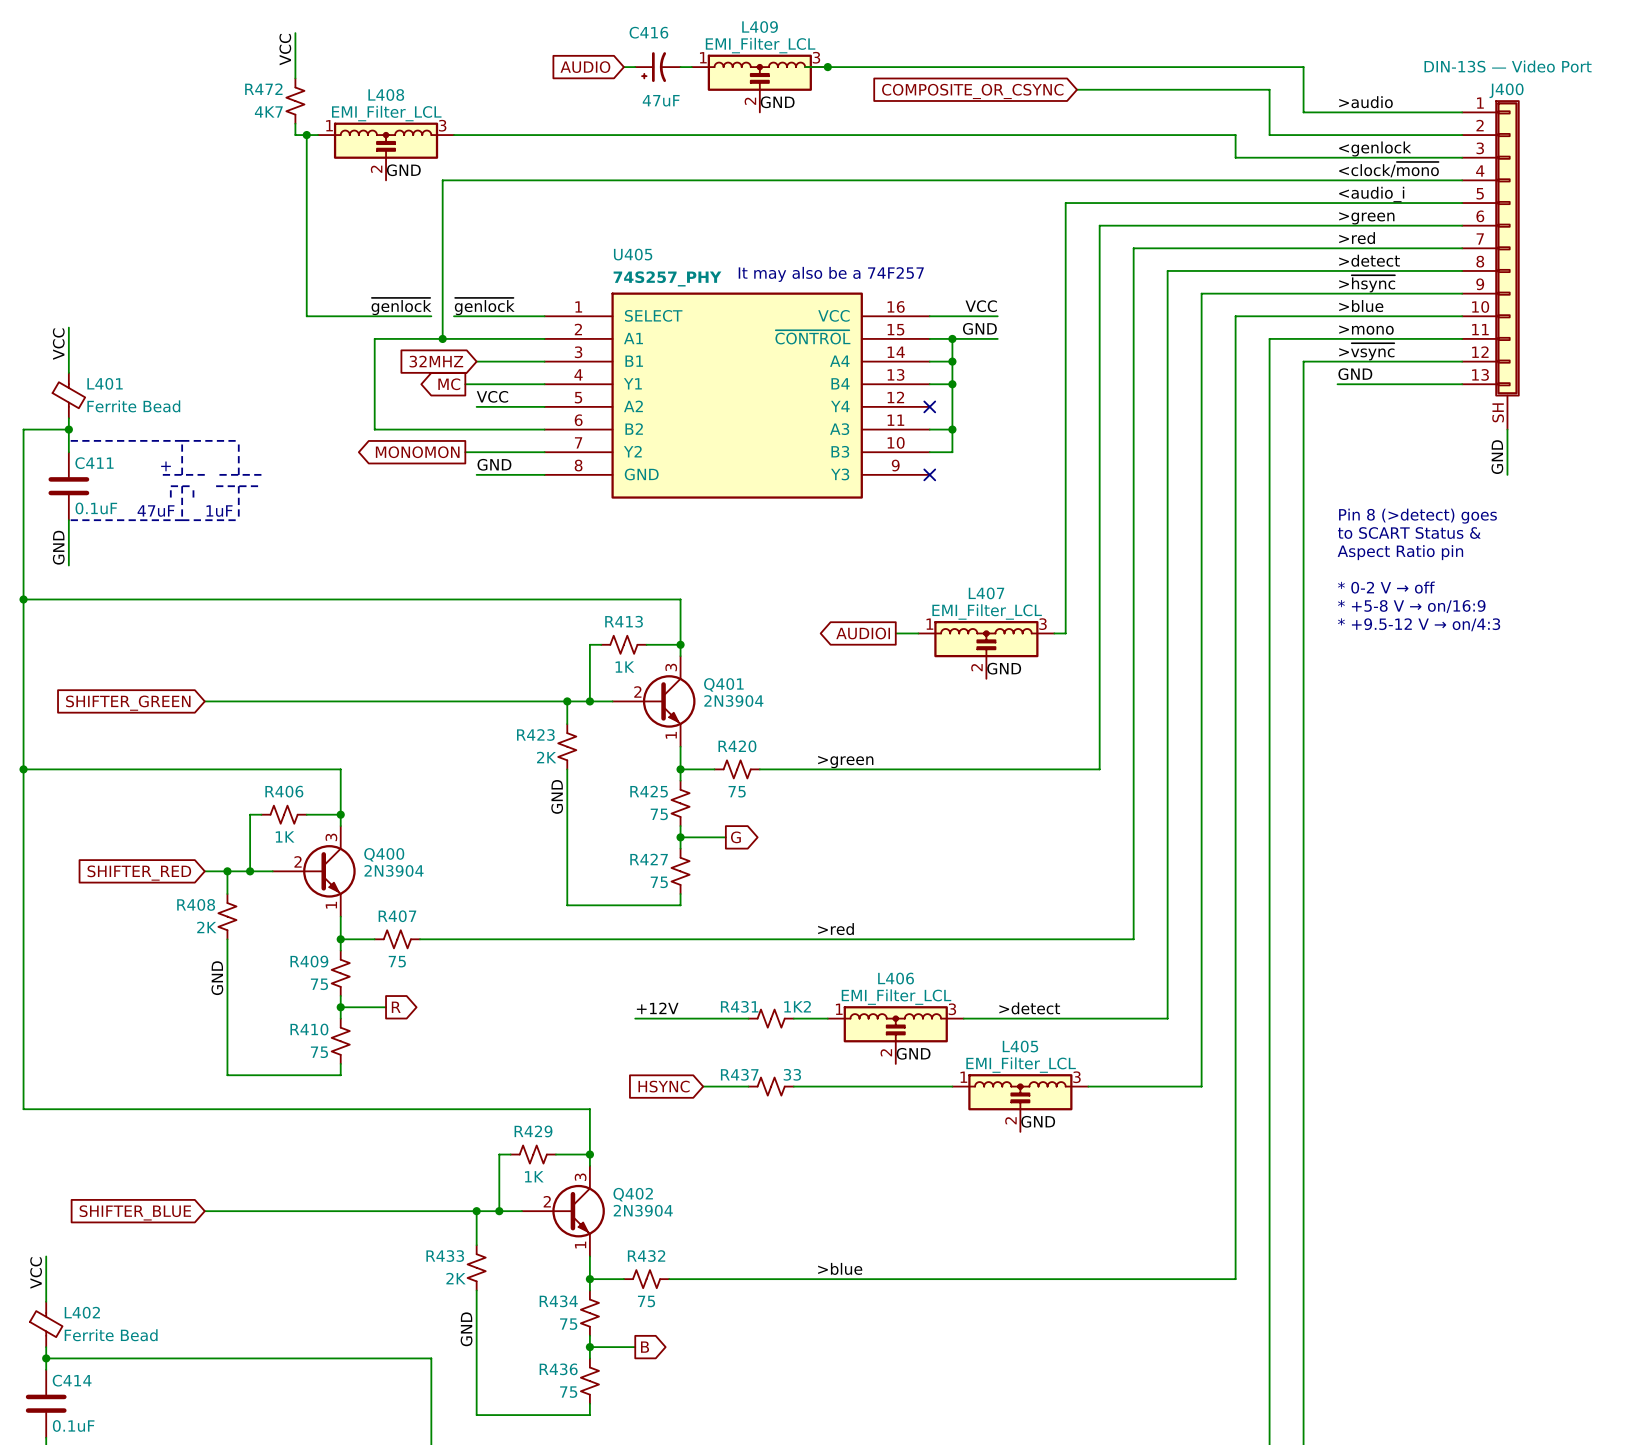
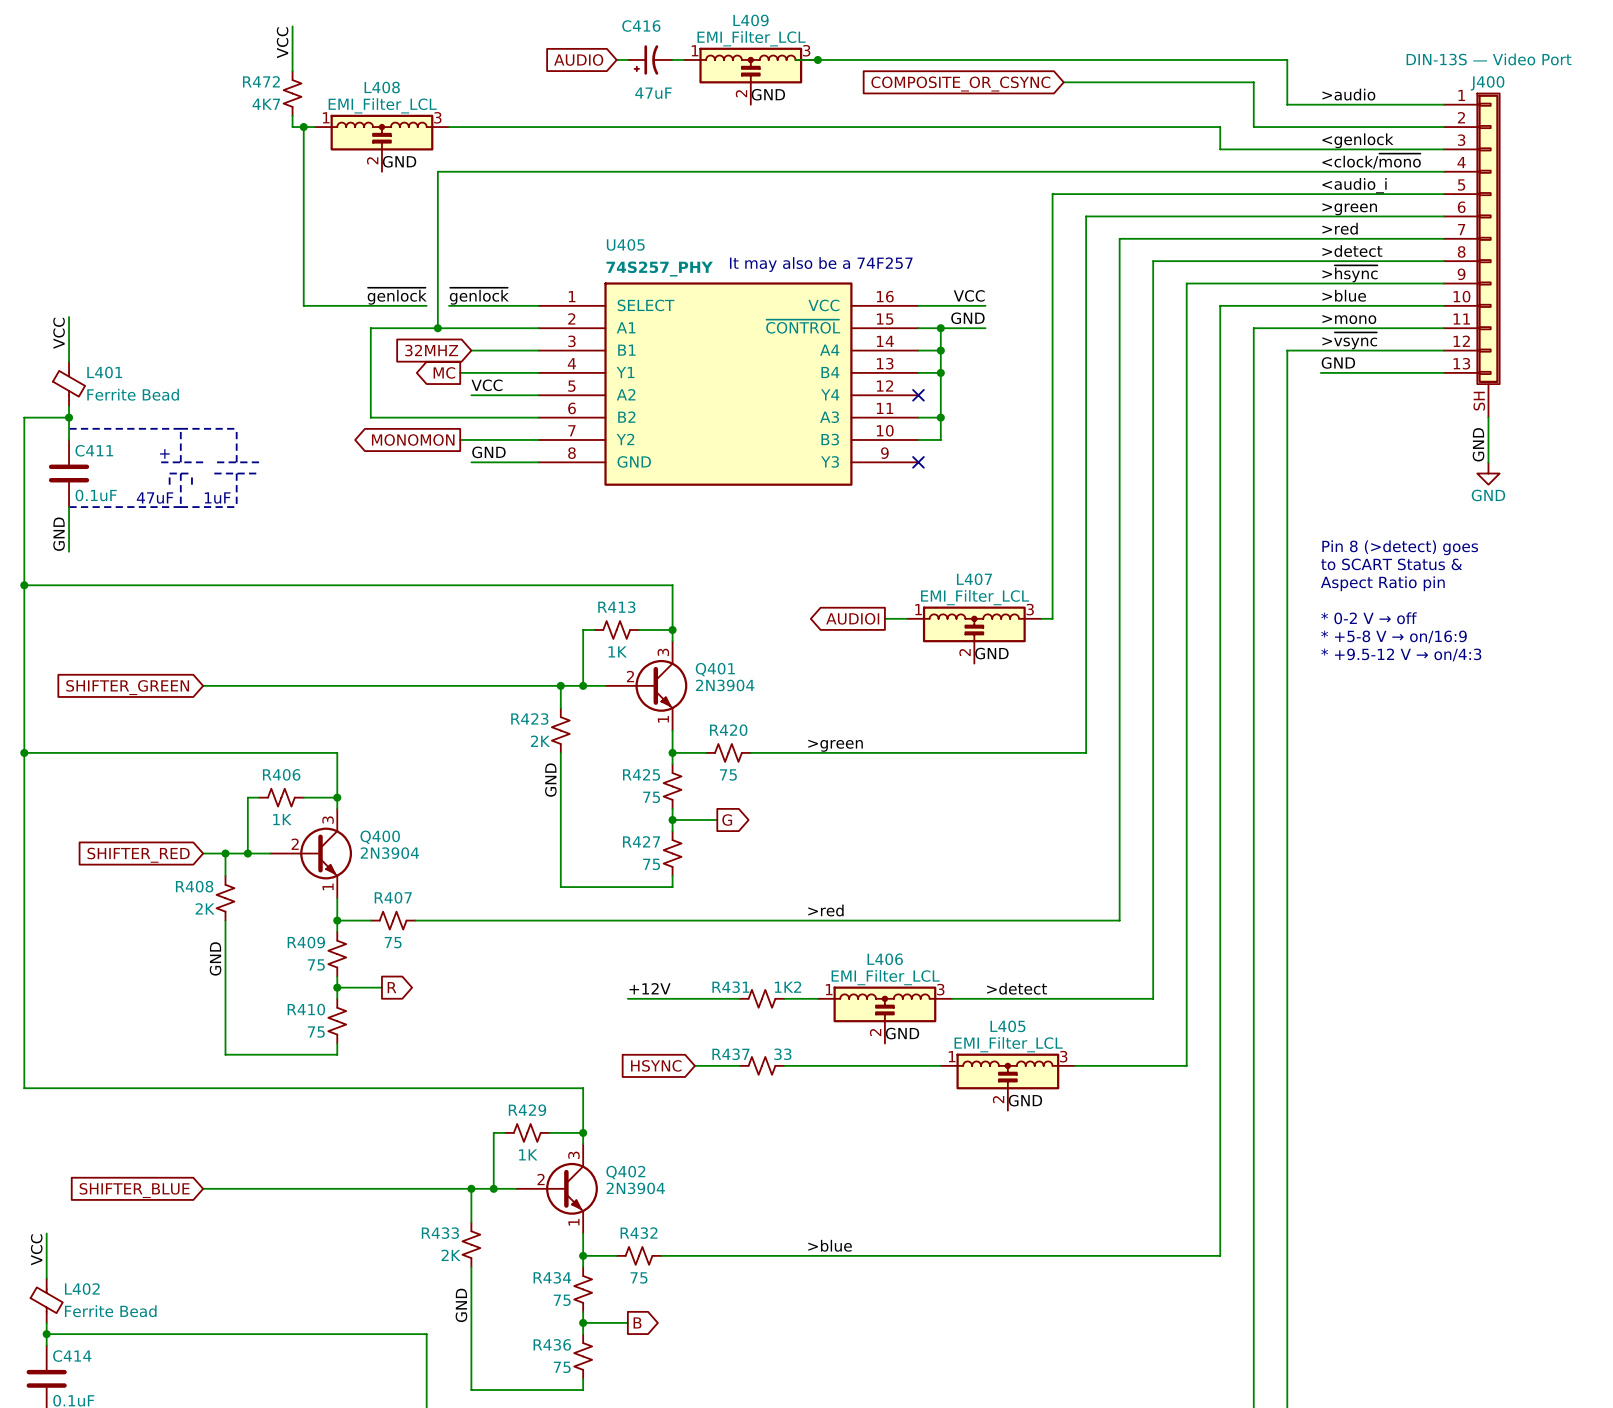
power symbol: none -> GND (1488, 473)
text position: Pin 8 (>detect) goes (1417, 516) -> Pin 8 (>detect) goes (1400, 547)
text position: to SCART Status & (1409, 533) -> to SCART Status & (1391, 564)
text position: Aspect Ratio pin (1400, 552) -> Aspect Ratio pin (1382, 583)
text position: * 0-2 V → off (1386, 587) -> * 0-2 V → off (1369, 618)
text position: * +5-8 V → on/16:9 (1411, 606) -> * +5-8 V → on/16:9 (1394, 636)
text position: * +9.5-12 V → on/4:3 (1419, 624) -> * +9.5-12 V → on/4:3 (1401, 654)

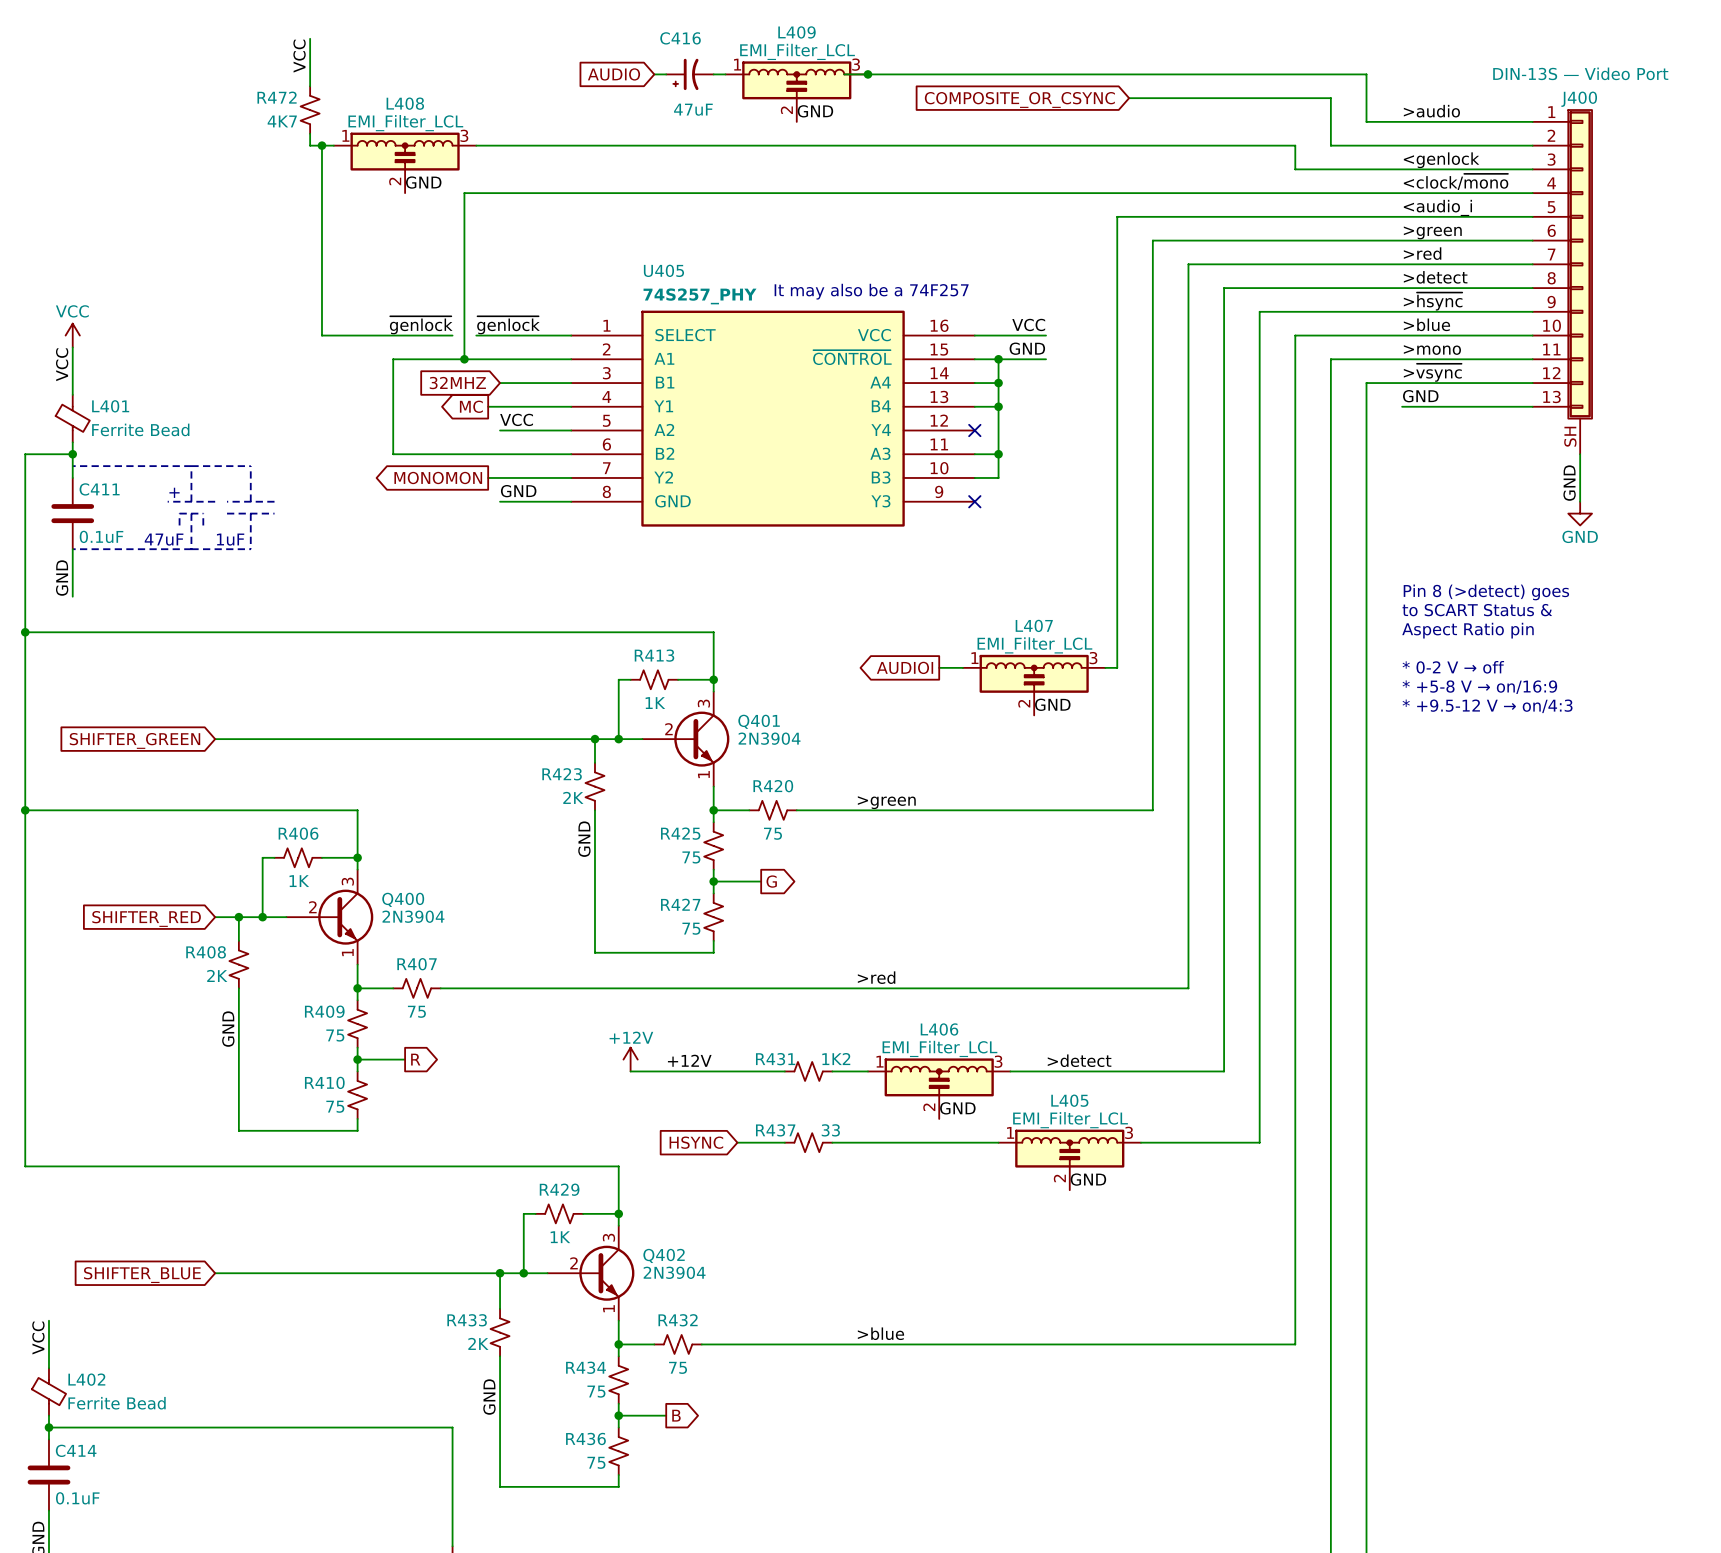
power symbol: none -> VCC (72, 335)
power symbol: none -> +12V (630, 1059)
wire: none -> (630, 1071) (666, 1071)

